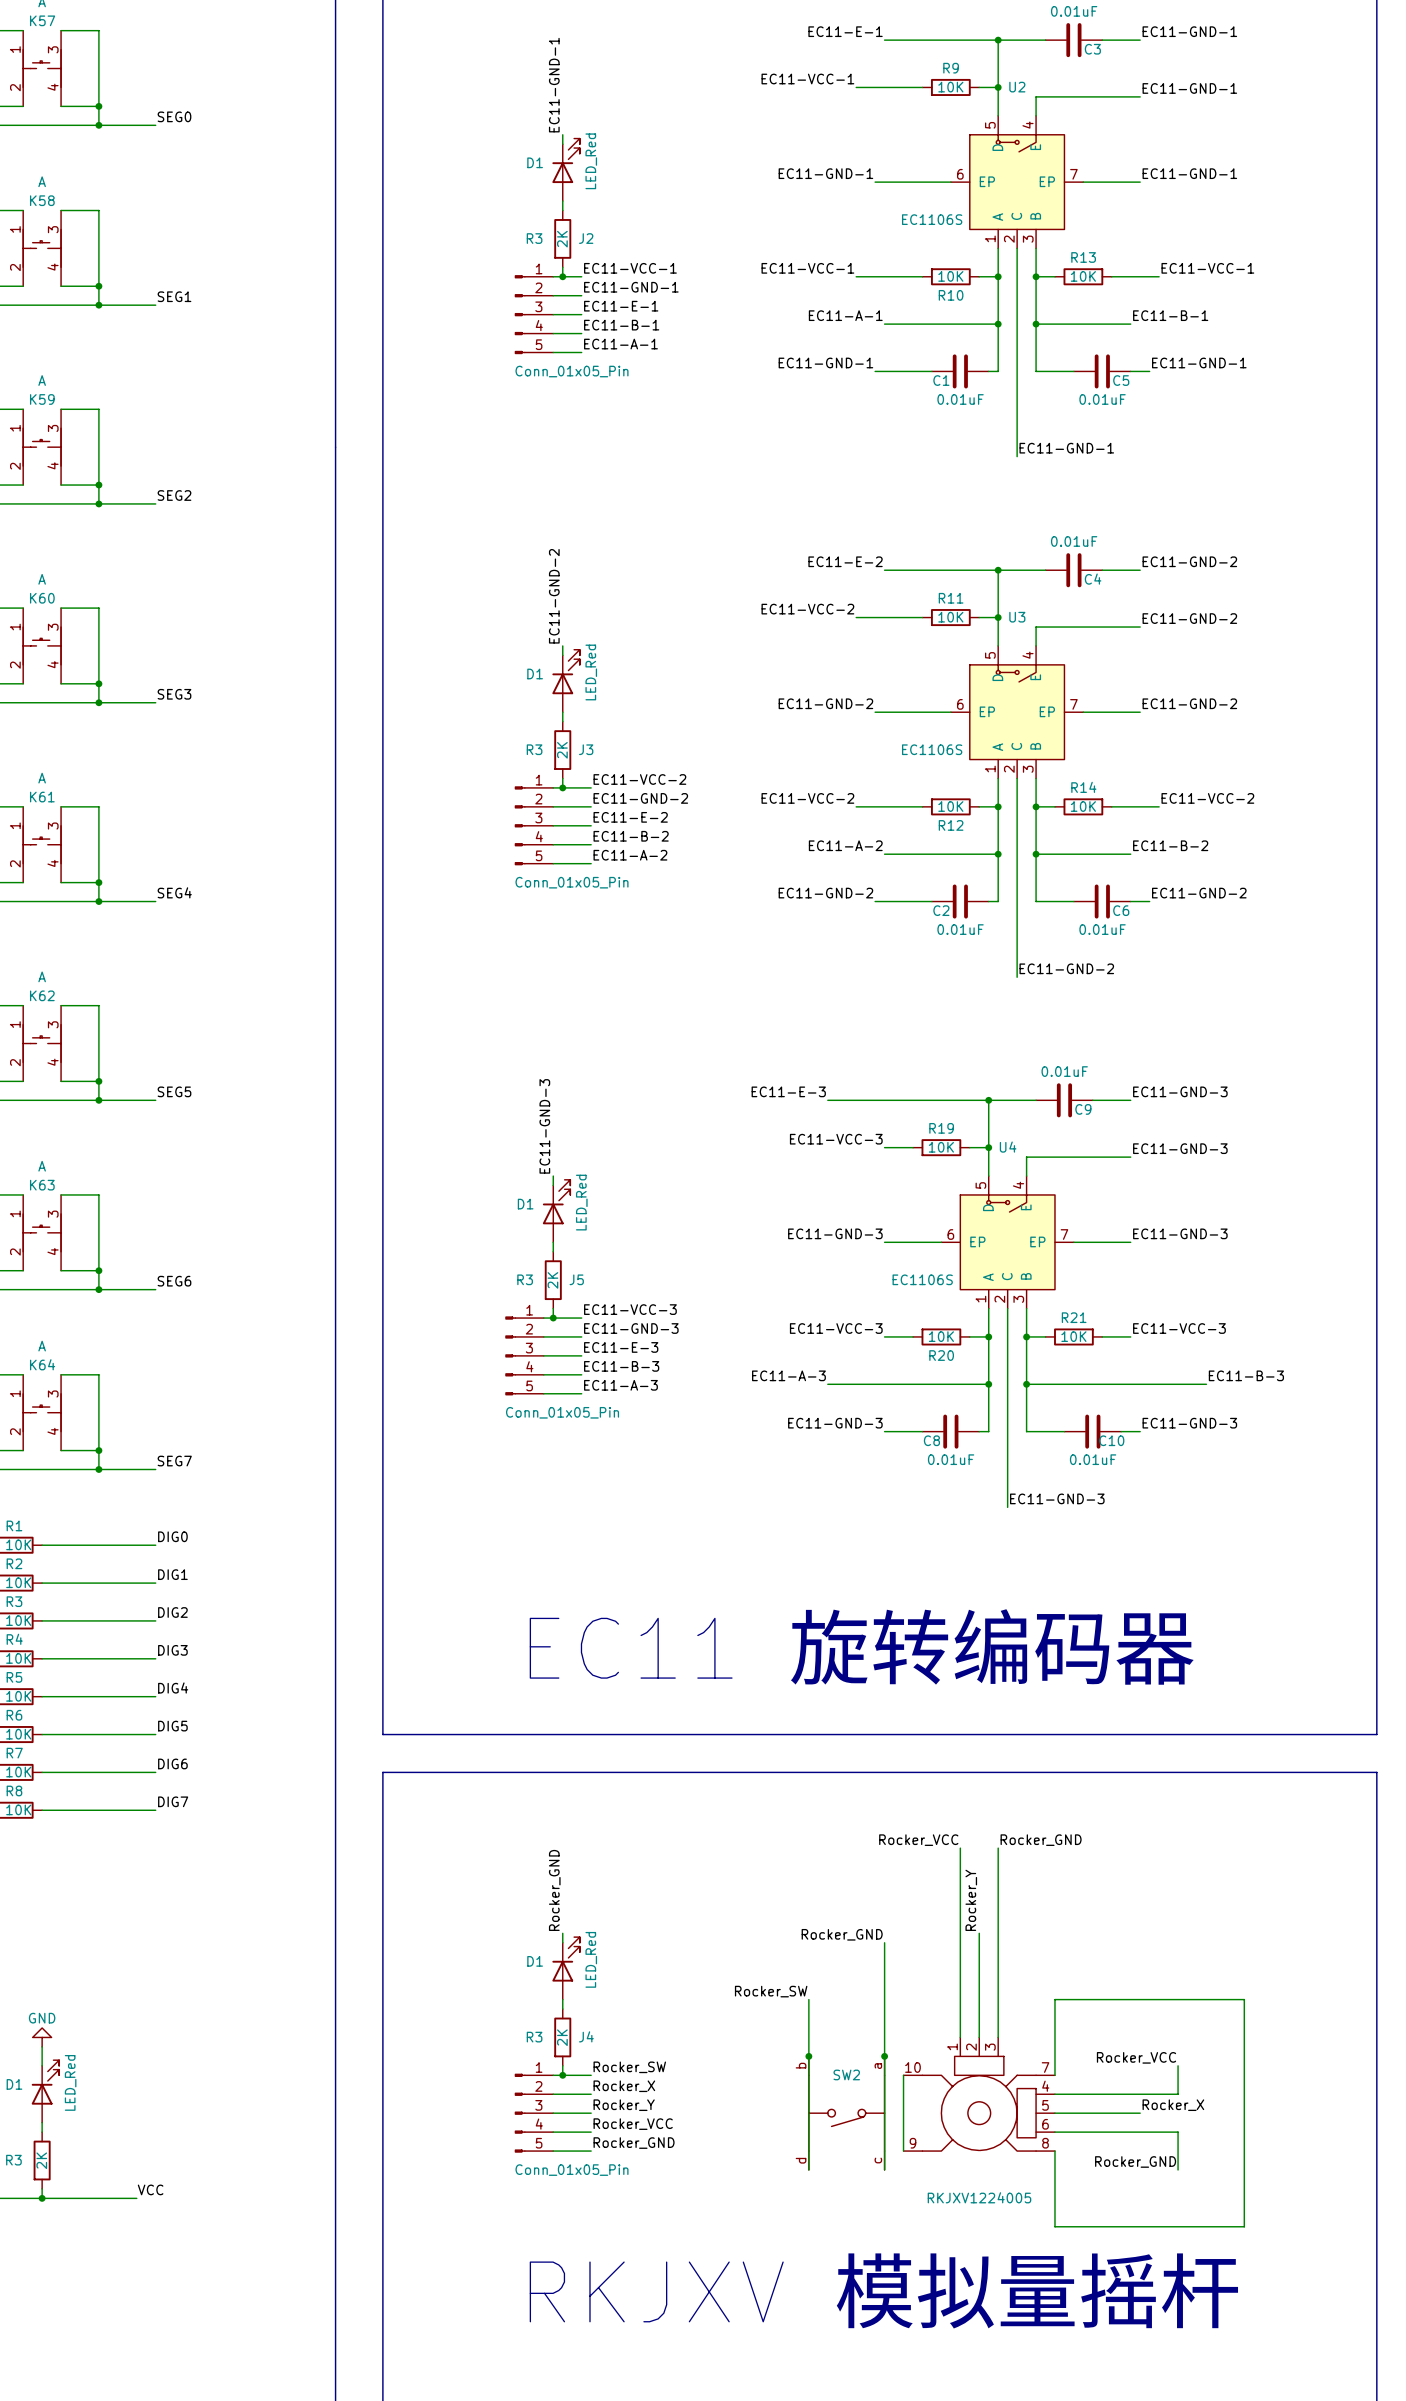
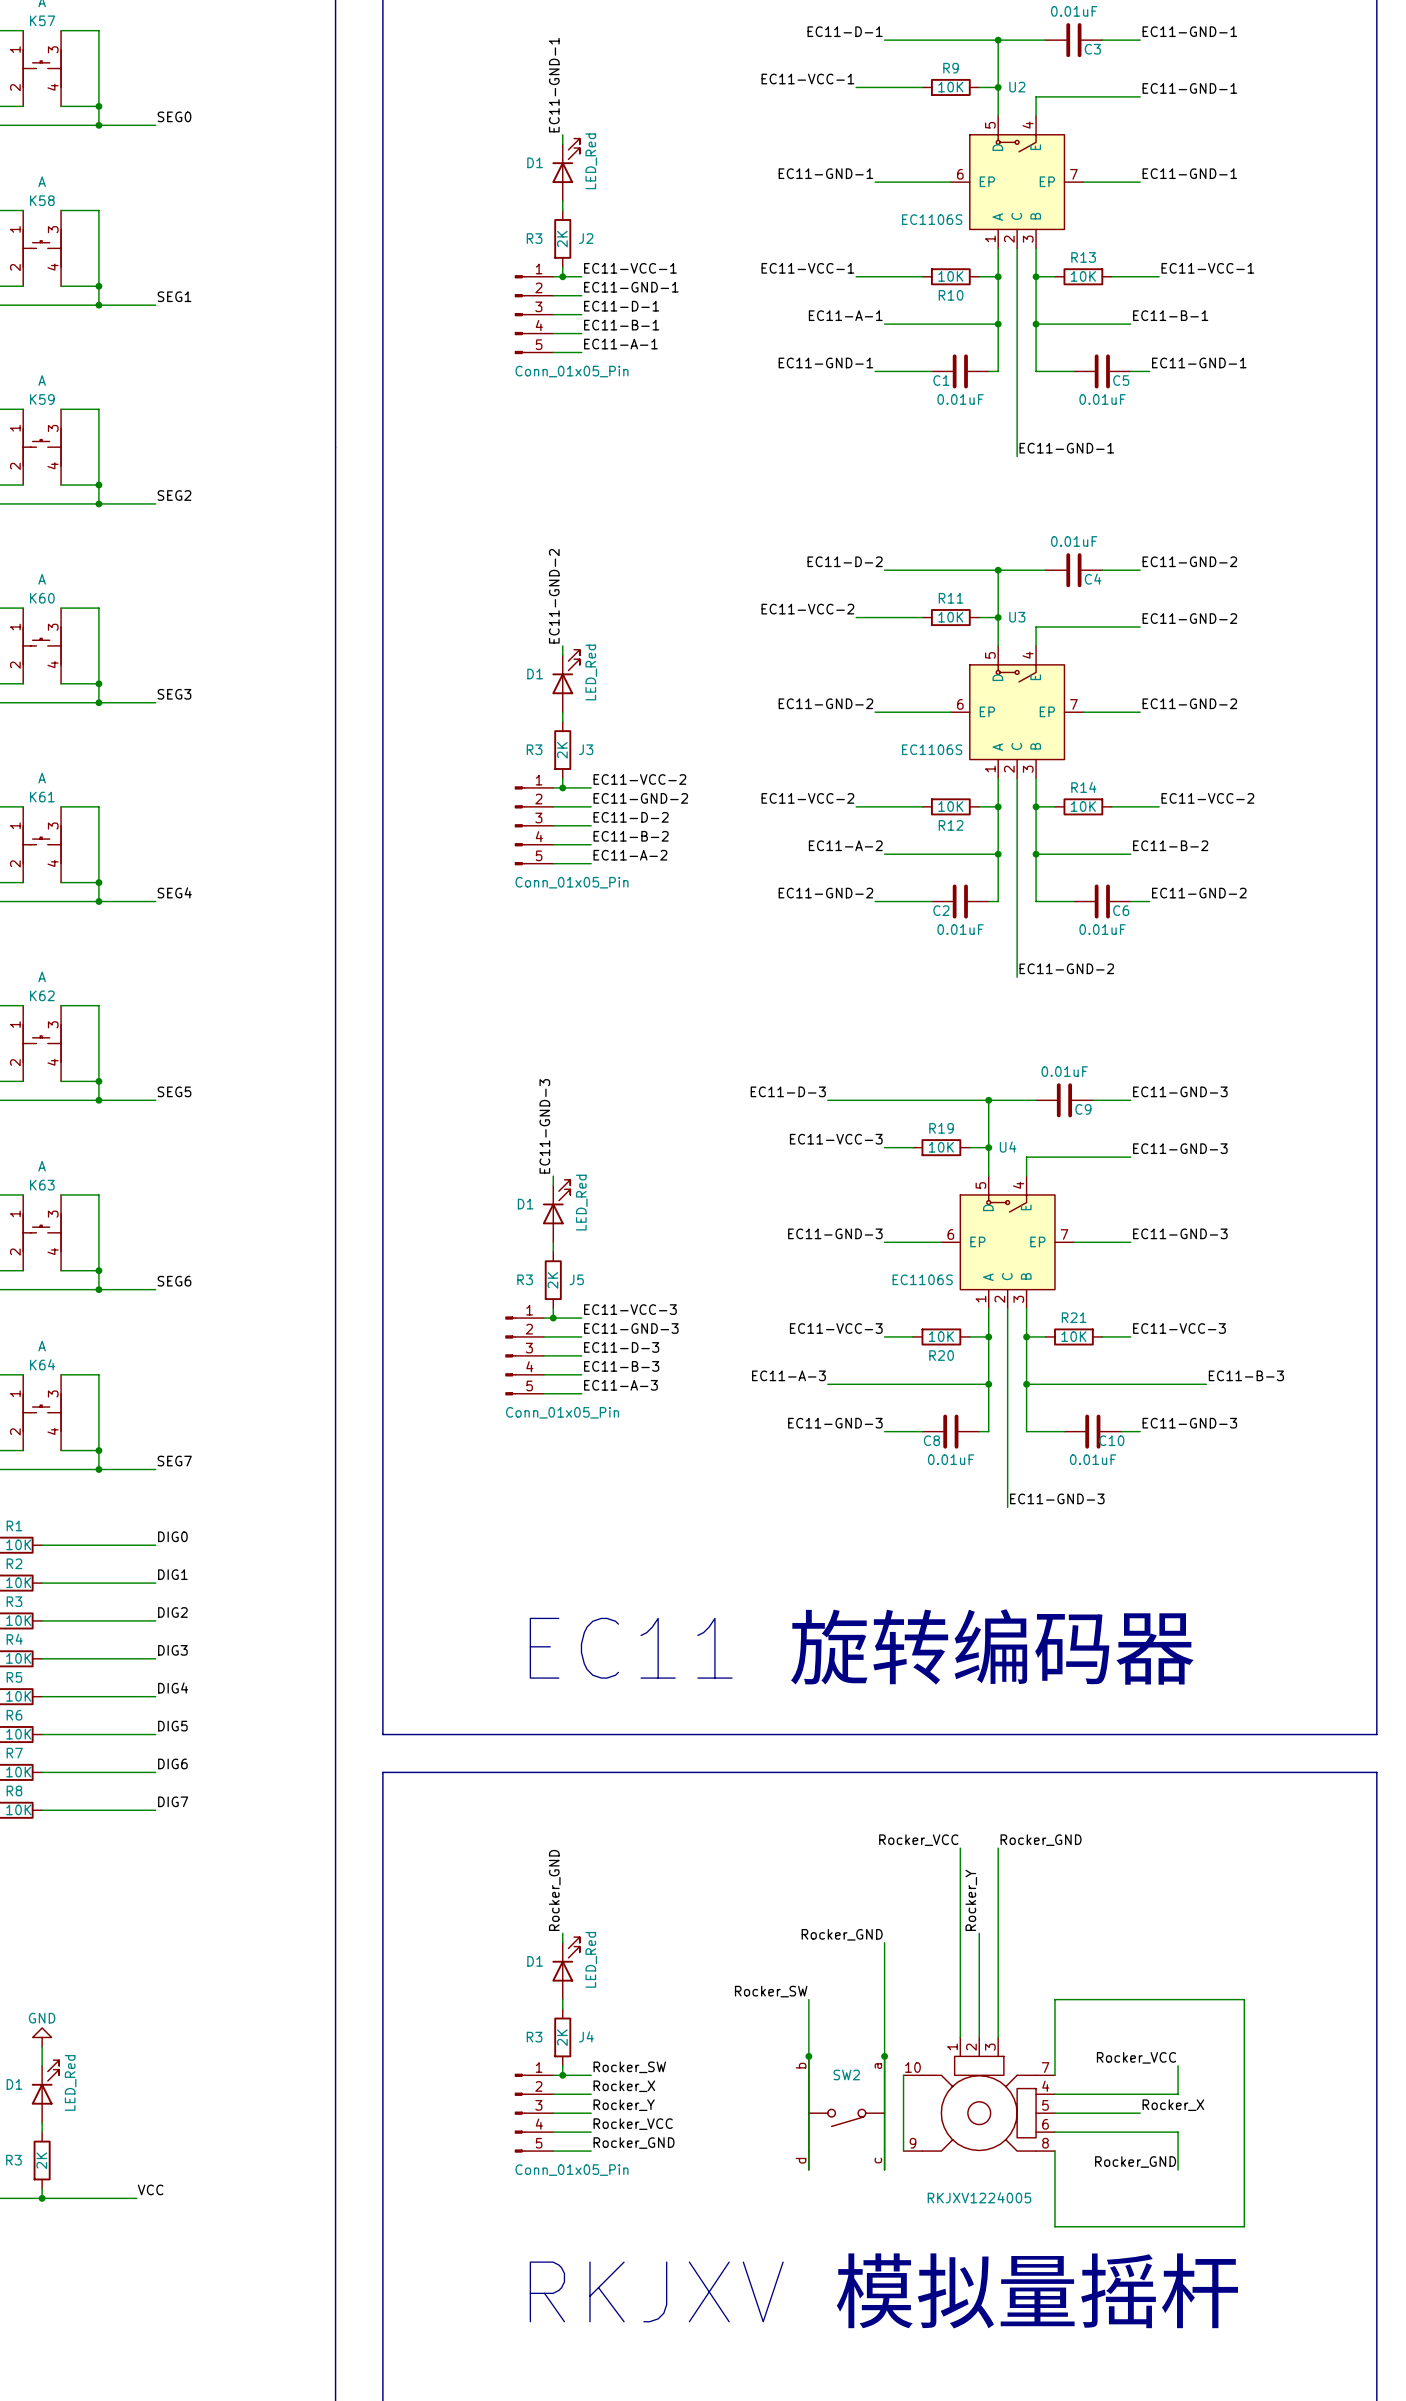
label: EC11-E-1 (845, 31) -> EC11-D-1 (845, 31)
label: EC11-E-1 (621, 306) -> EC11-D-1 (621, 306)
label: EC11-E-2 (845, 561) -> EC11-D-2 (845, 561)
label: EC11-E-2 (630, 817) -> EC11-D-2 (631, 817)
label: EC11-E-3 (788, 1091) -> EC11-D-3 (788, 1091)
label: EC11-E-3 (621, 1347) -> EC11-D-3 (621, 1347)

